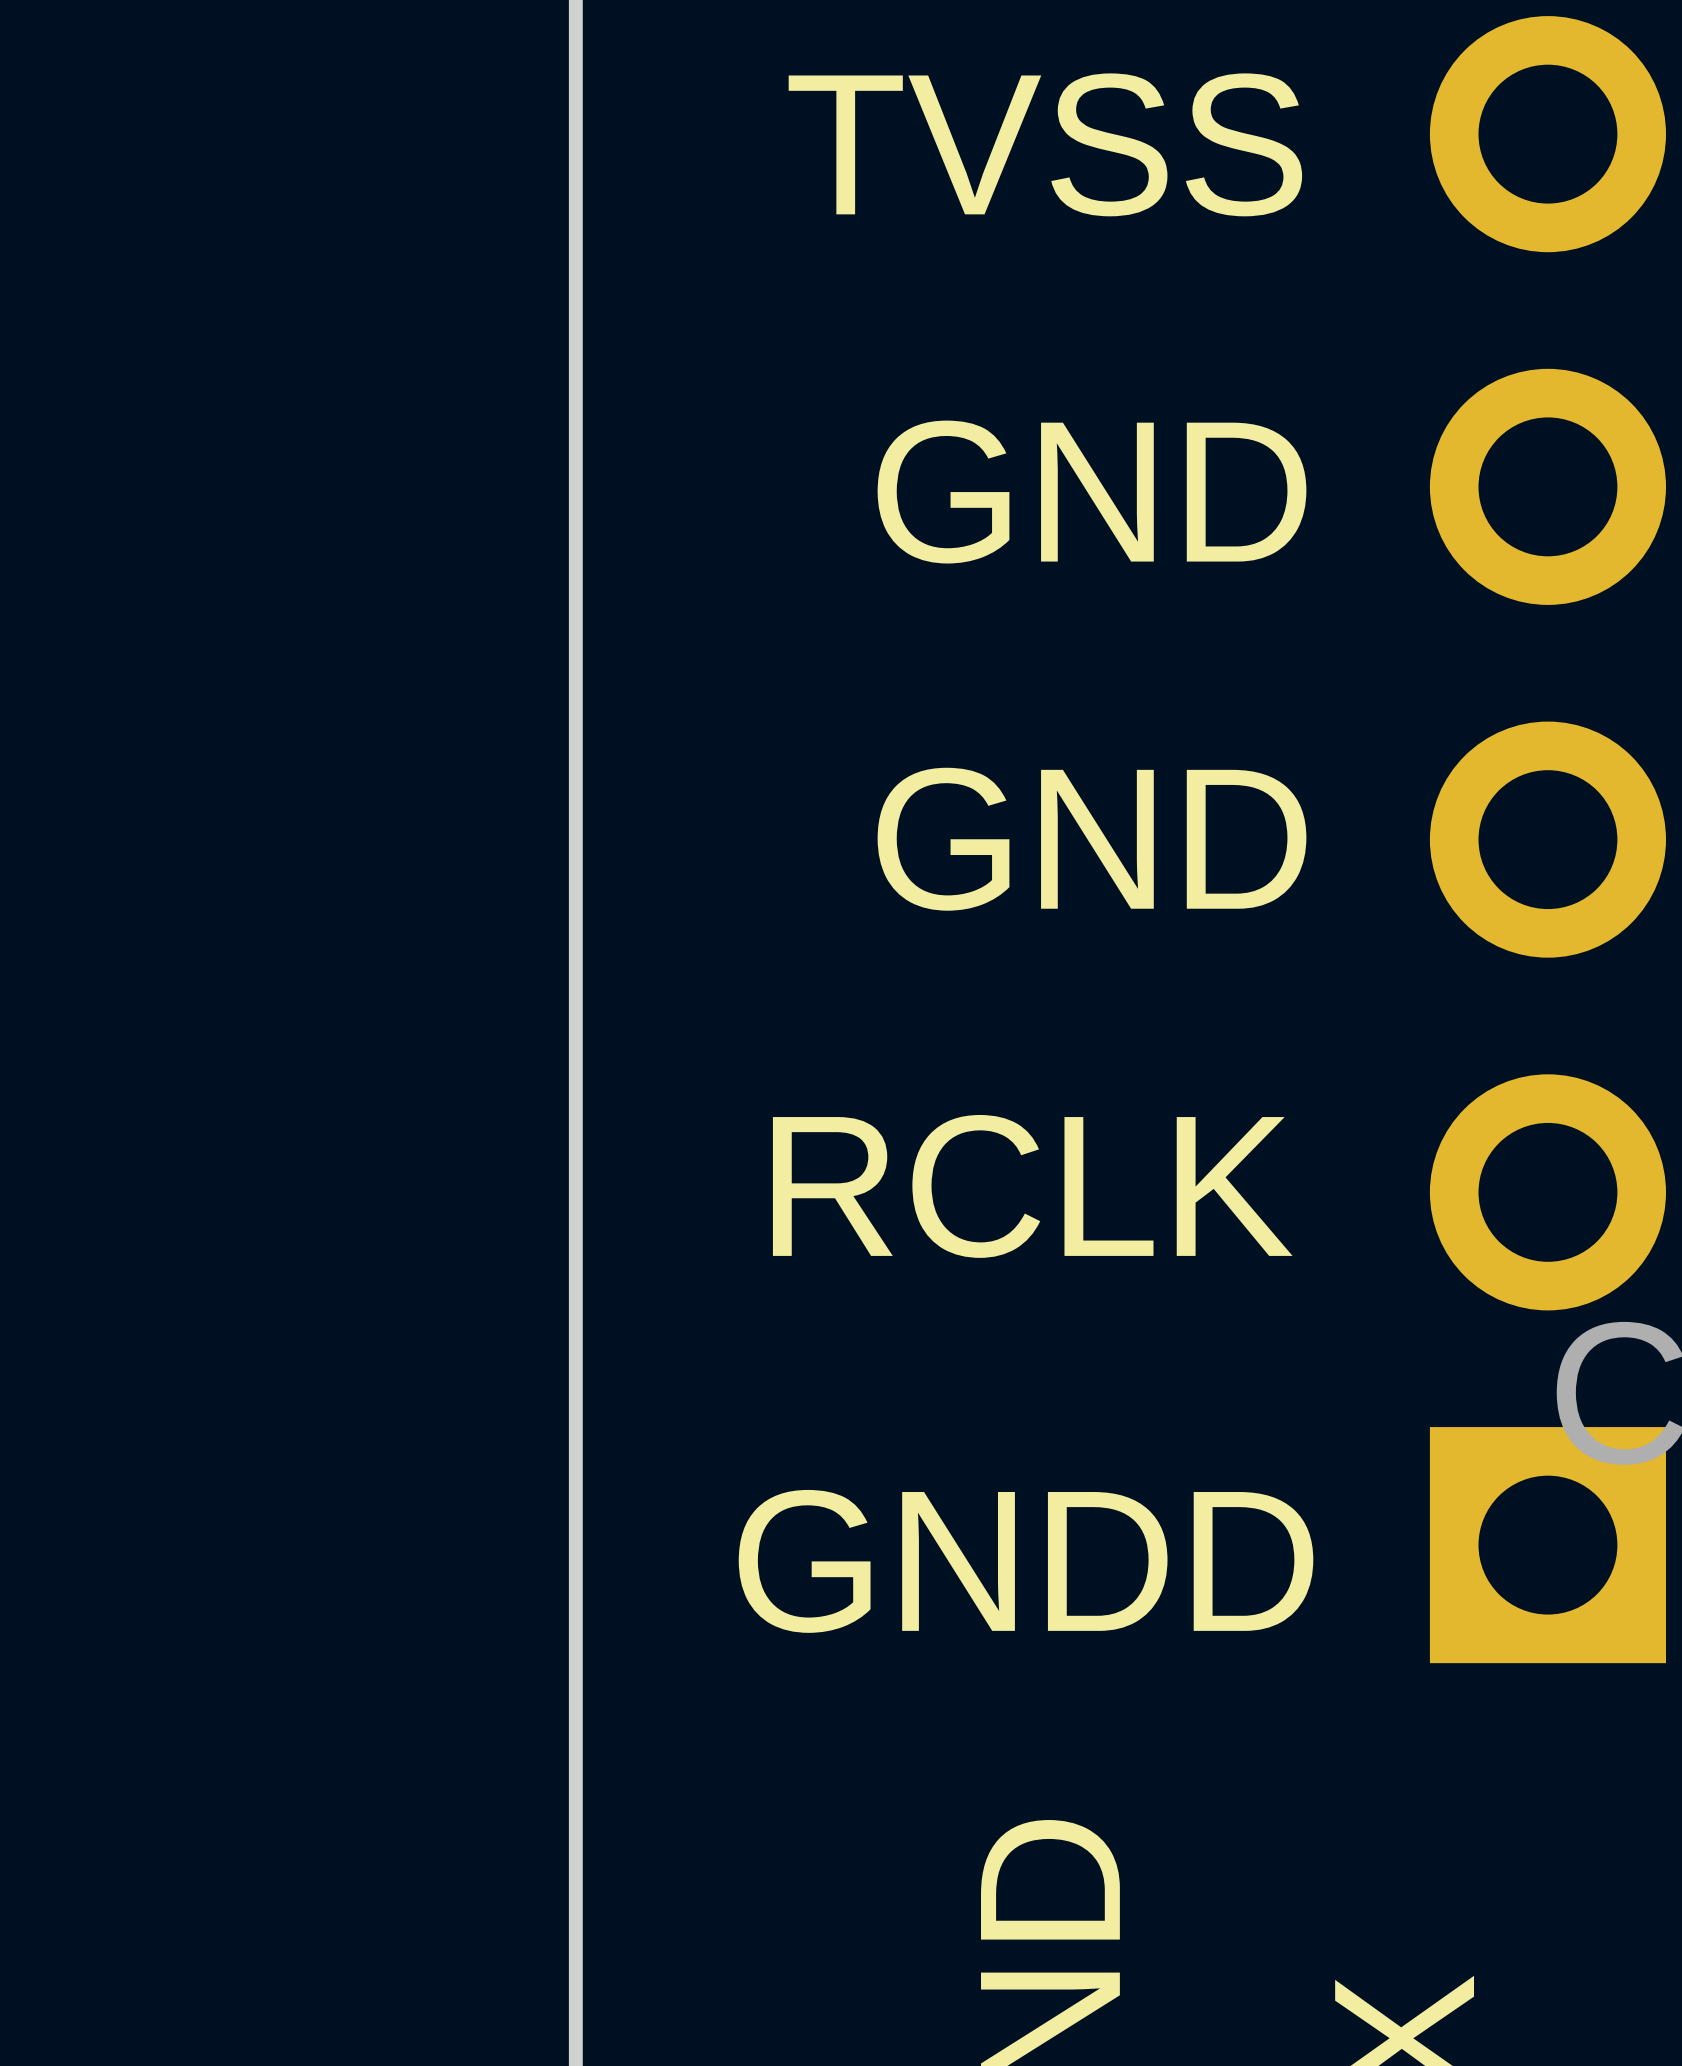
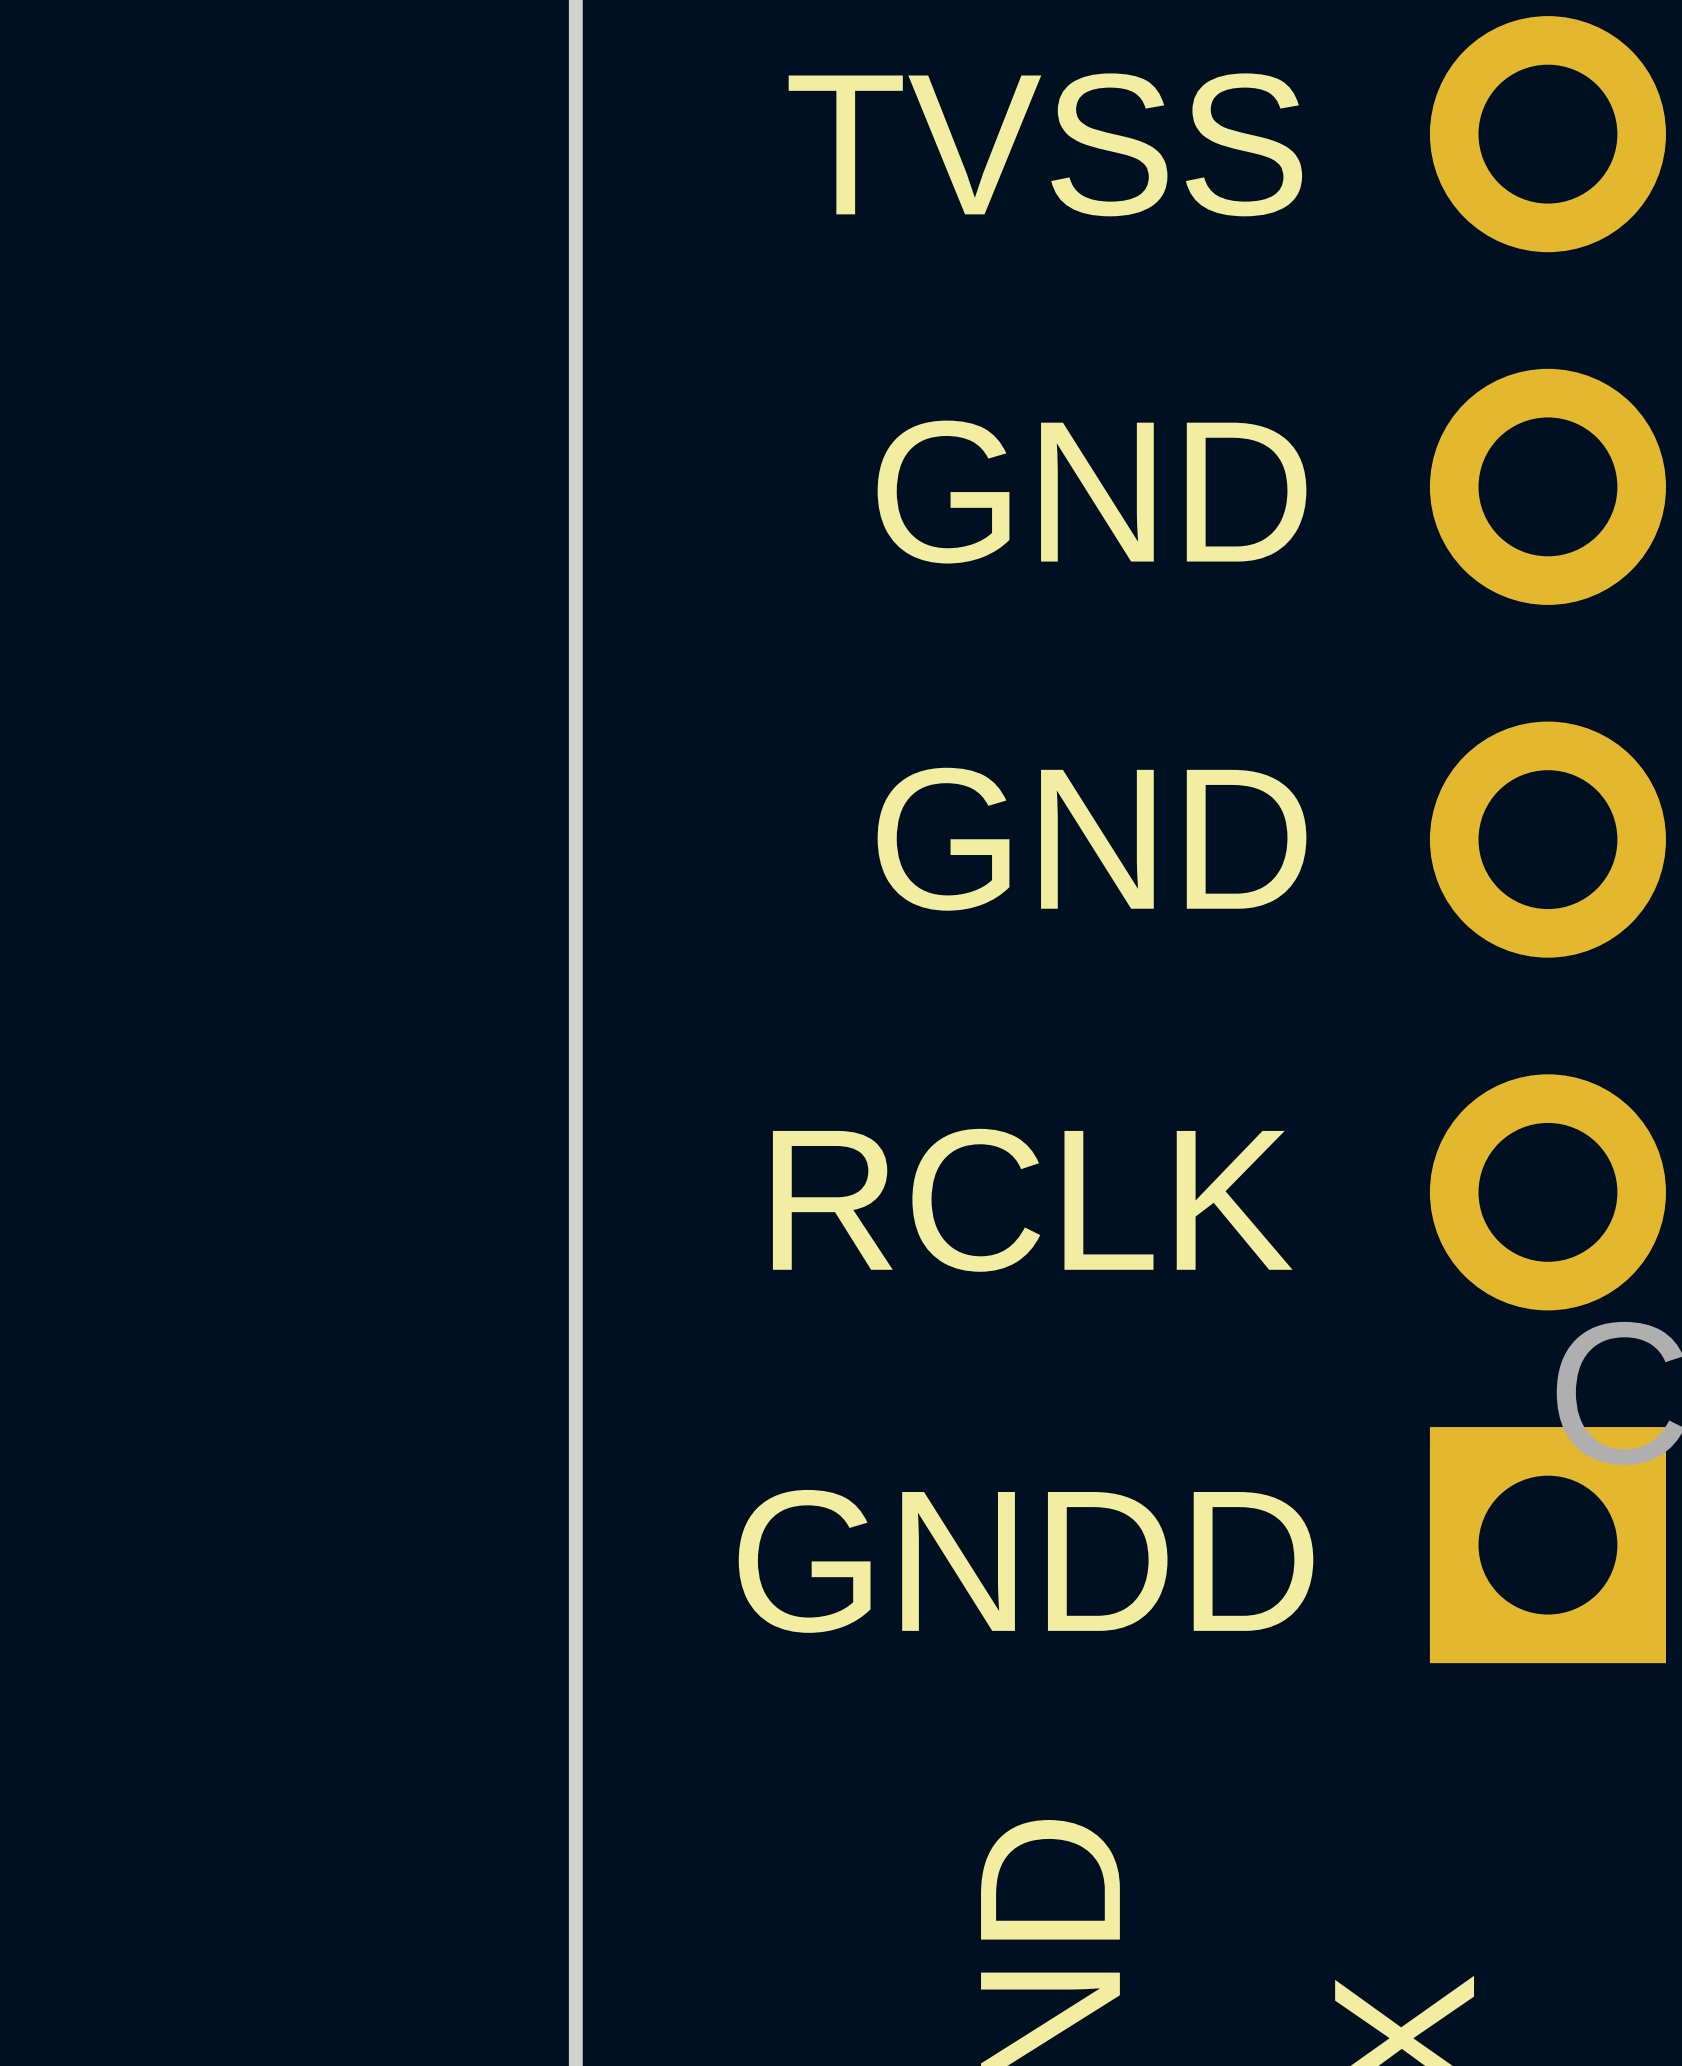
text position: RCLK (1032, 1186) -> RCLK (1032, 1200)

